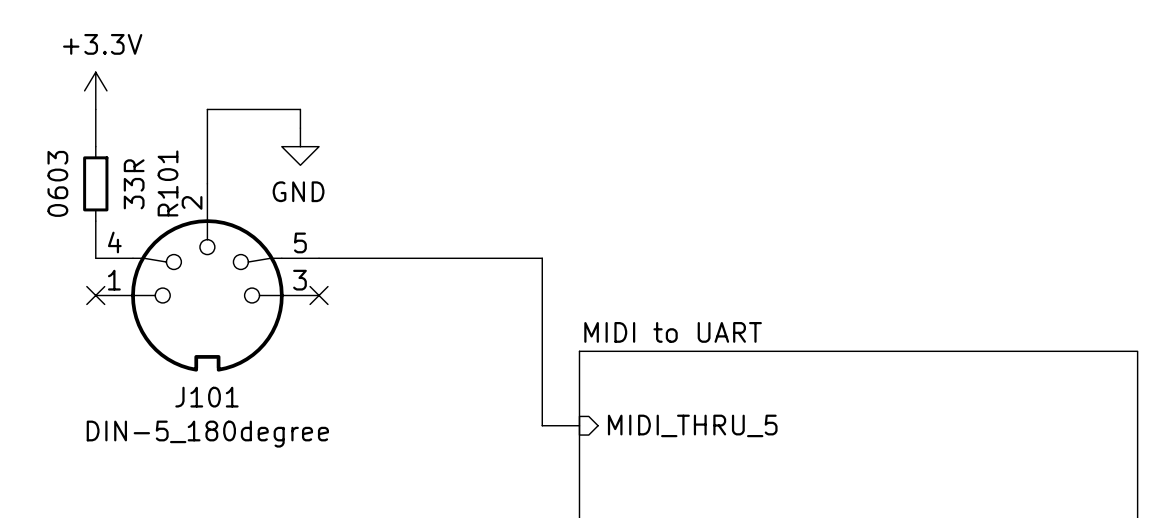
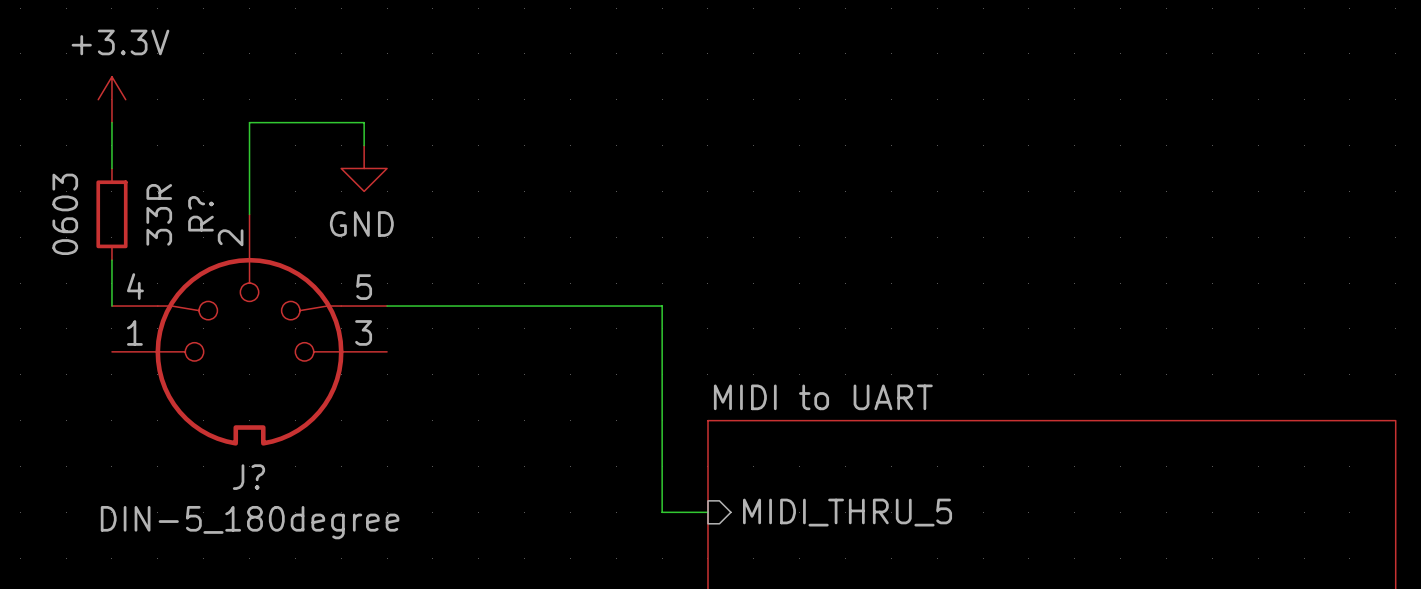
R101 name: R101 (168, 183) -> R? (200, 213)
no-connect mark: (95, 295) -> none
no-connect mark: (319, 295) -> none
J101 name: J101 (206, 397) -> J? (248, 477)

